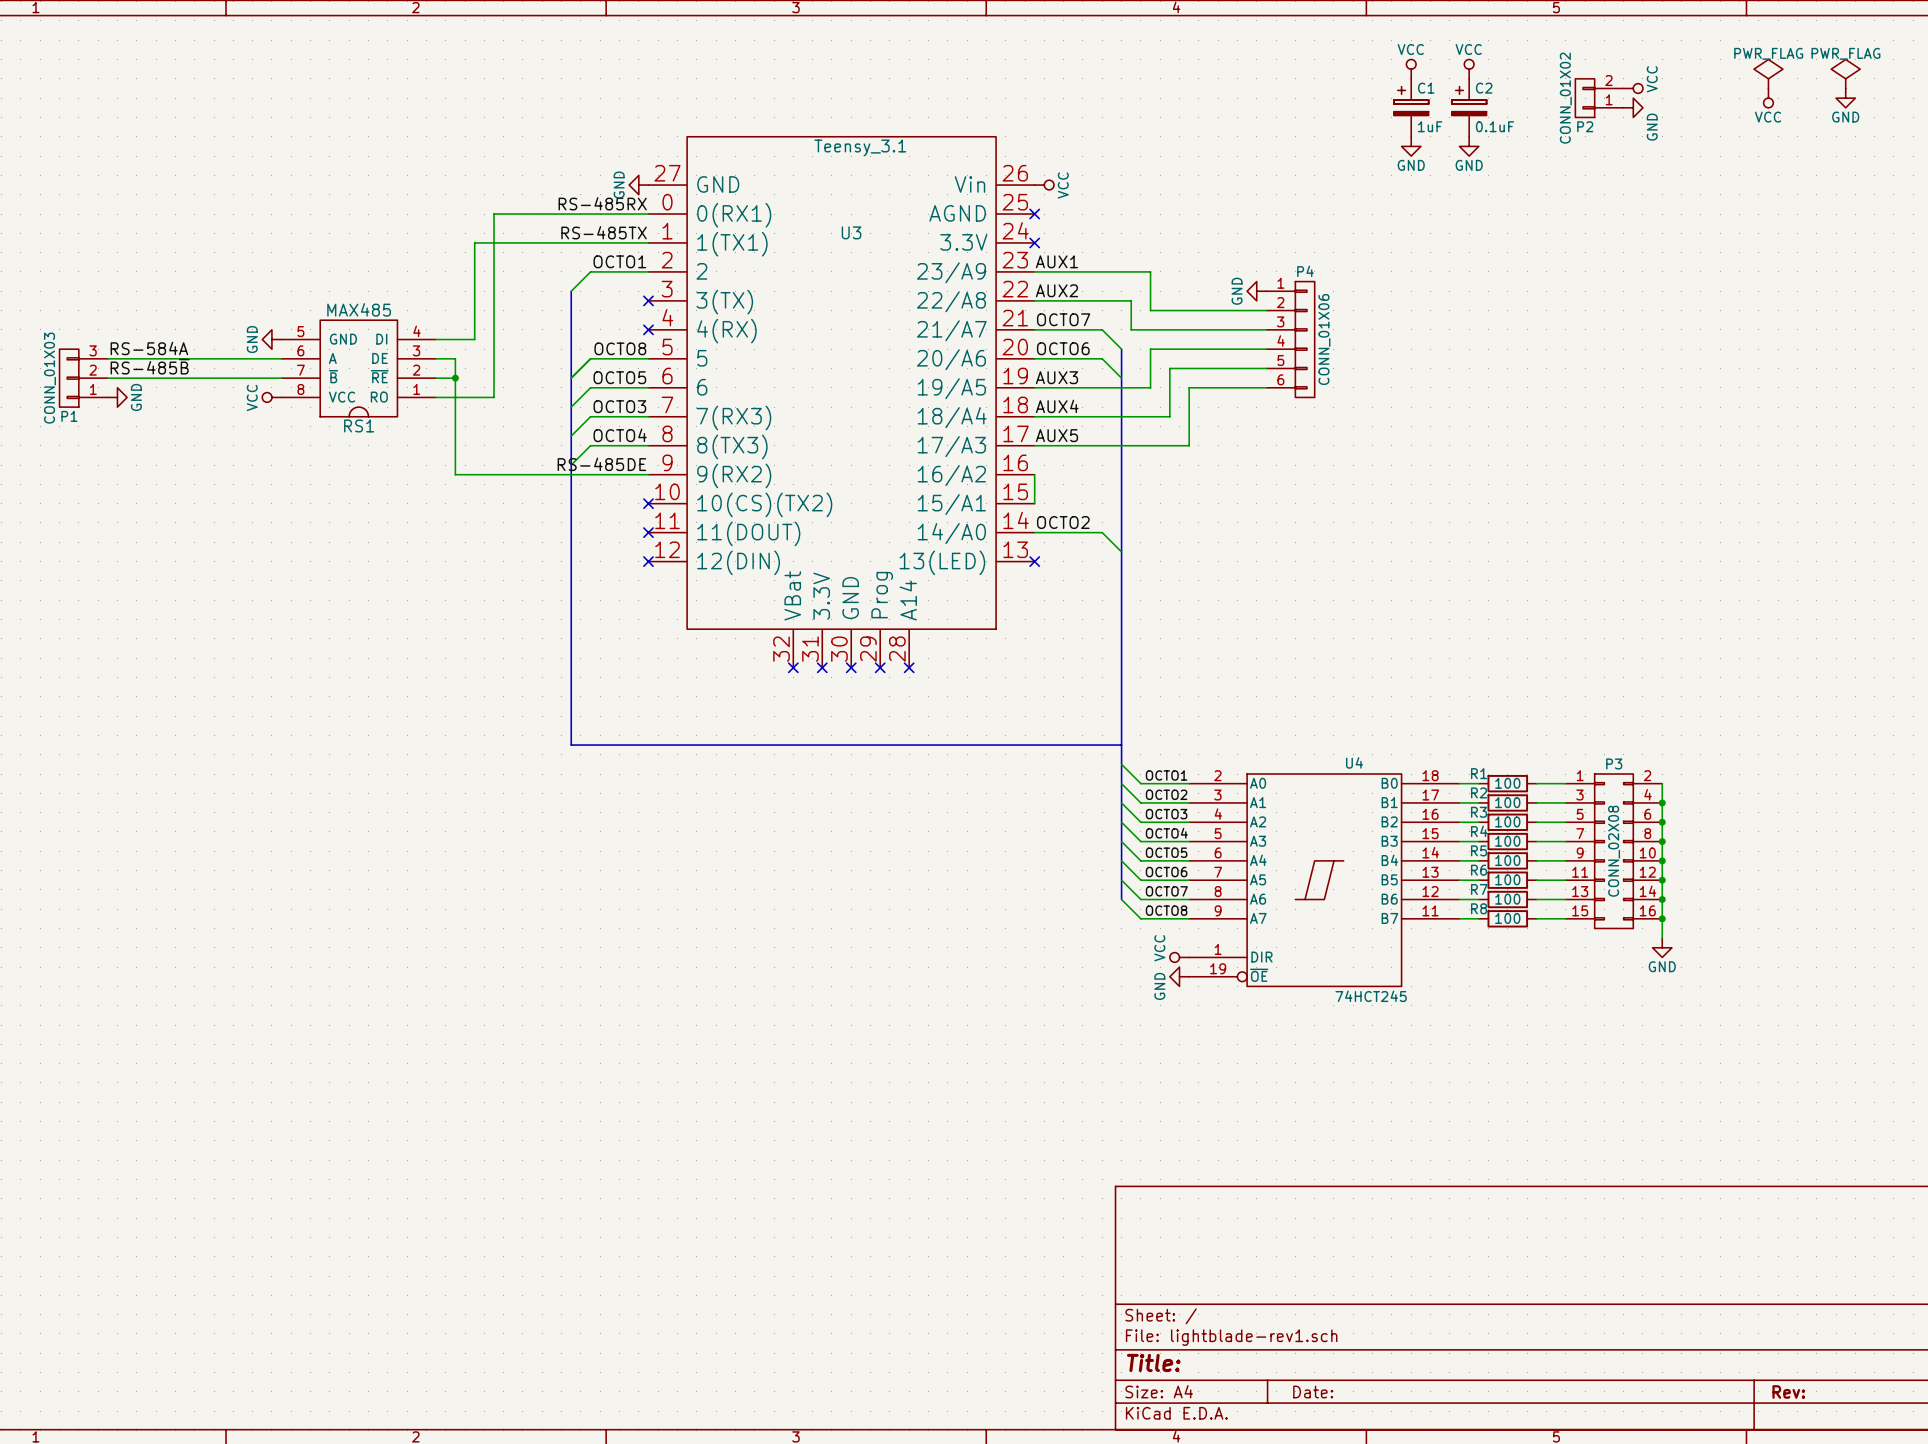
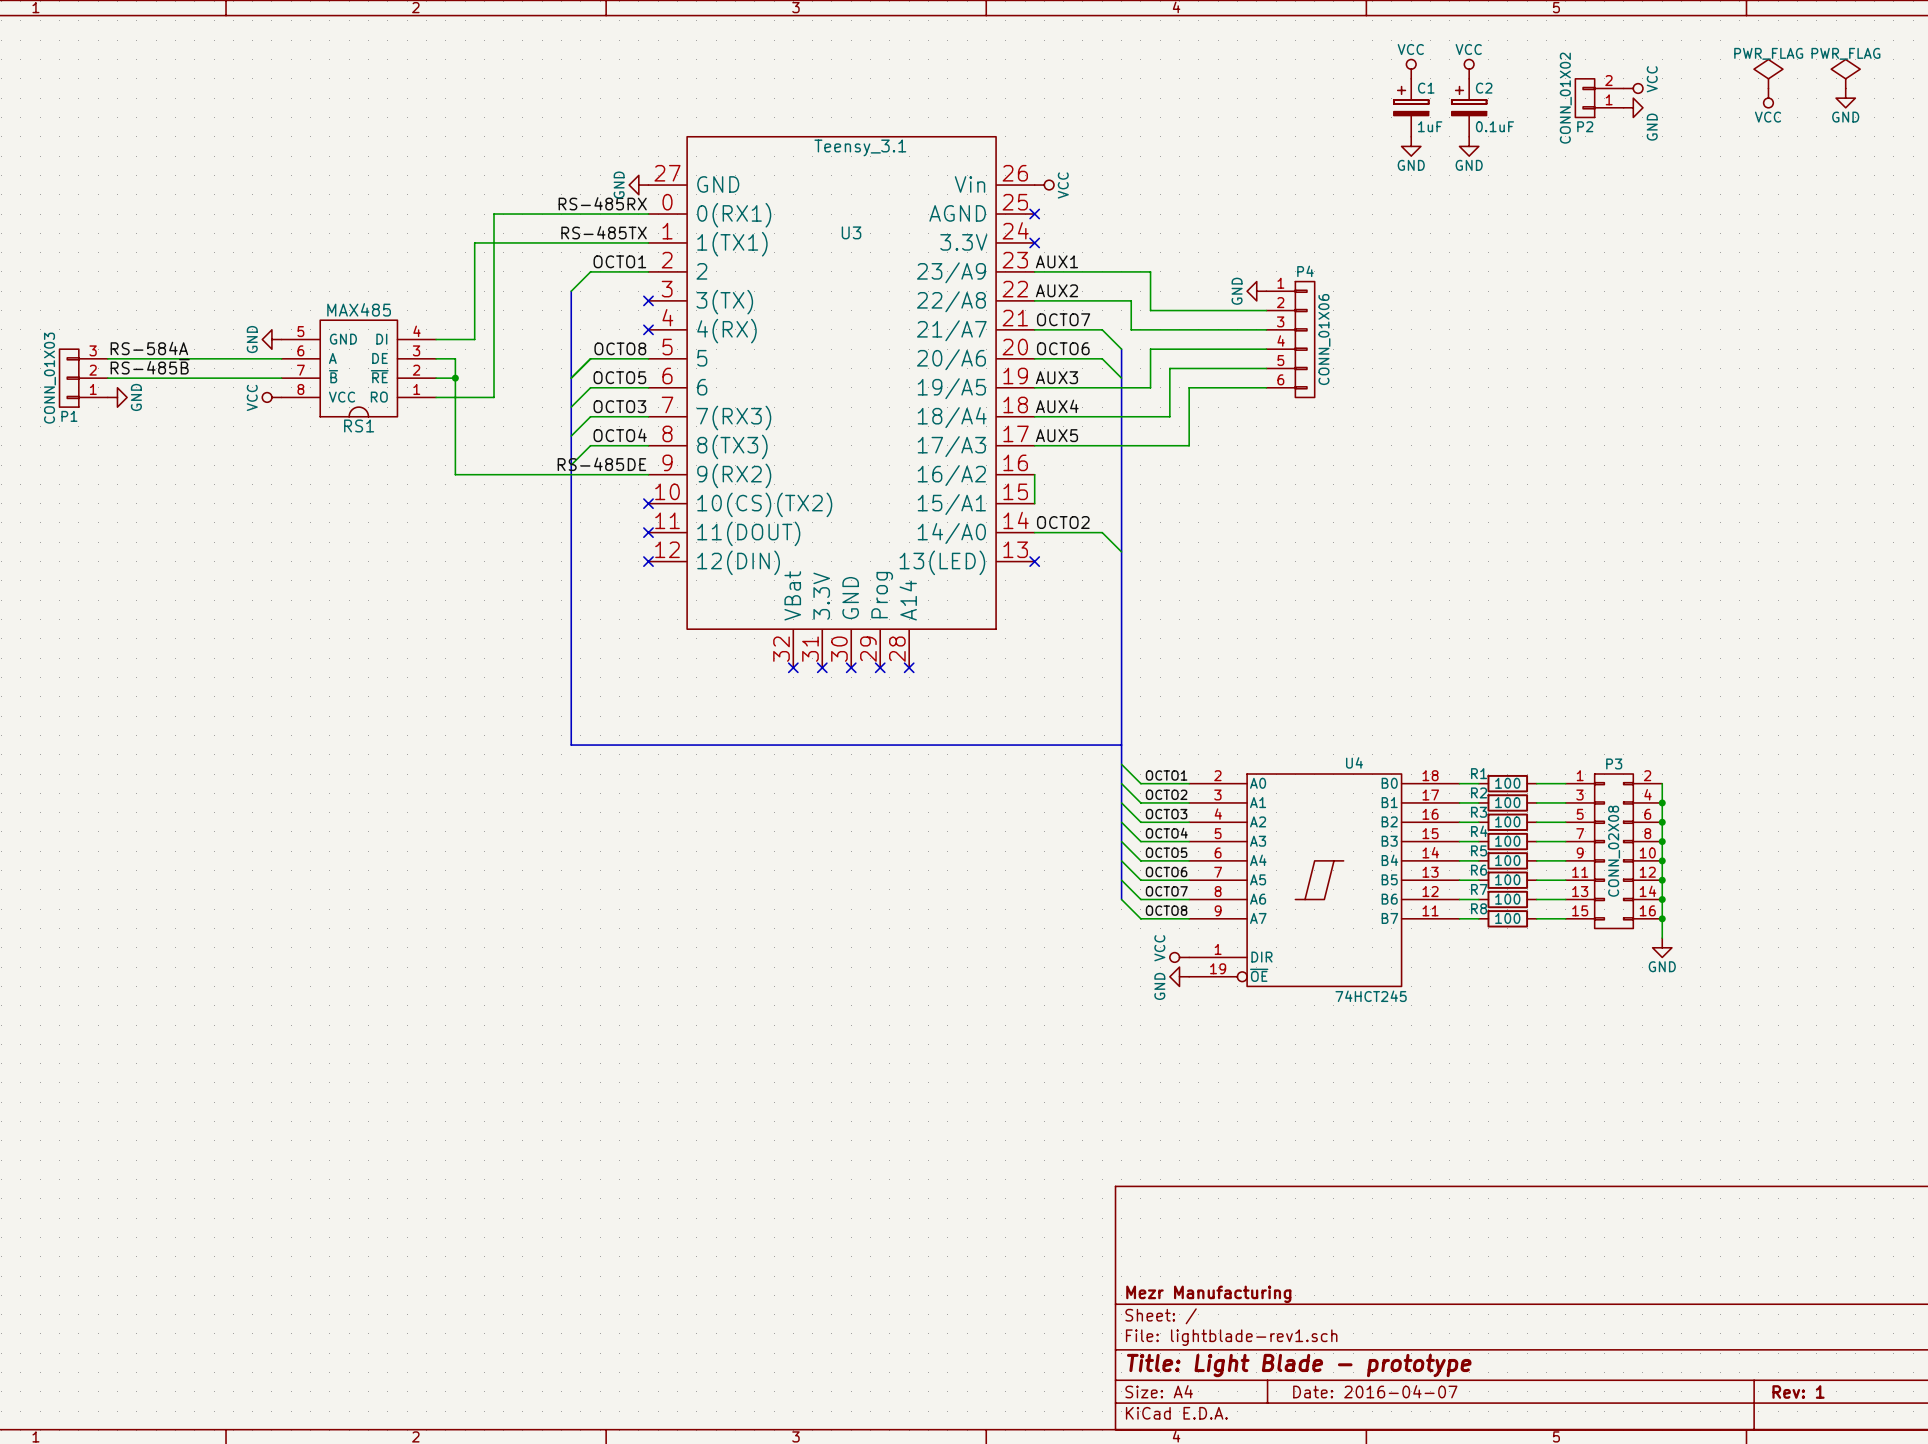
title block: none -> Mezr Manufacturing (1208, 1294)
title block: Title: (1153, 1362) -> Title: Light Blade - prototype (1299, 1365)
title block: Date: (1313, 1392) -> Date: 2016-04-07 (1375, 1391)
title block: Rev: (1788, 1392) -> Rev: 1 (1798, 1392)

